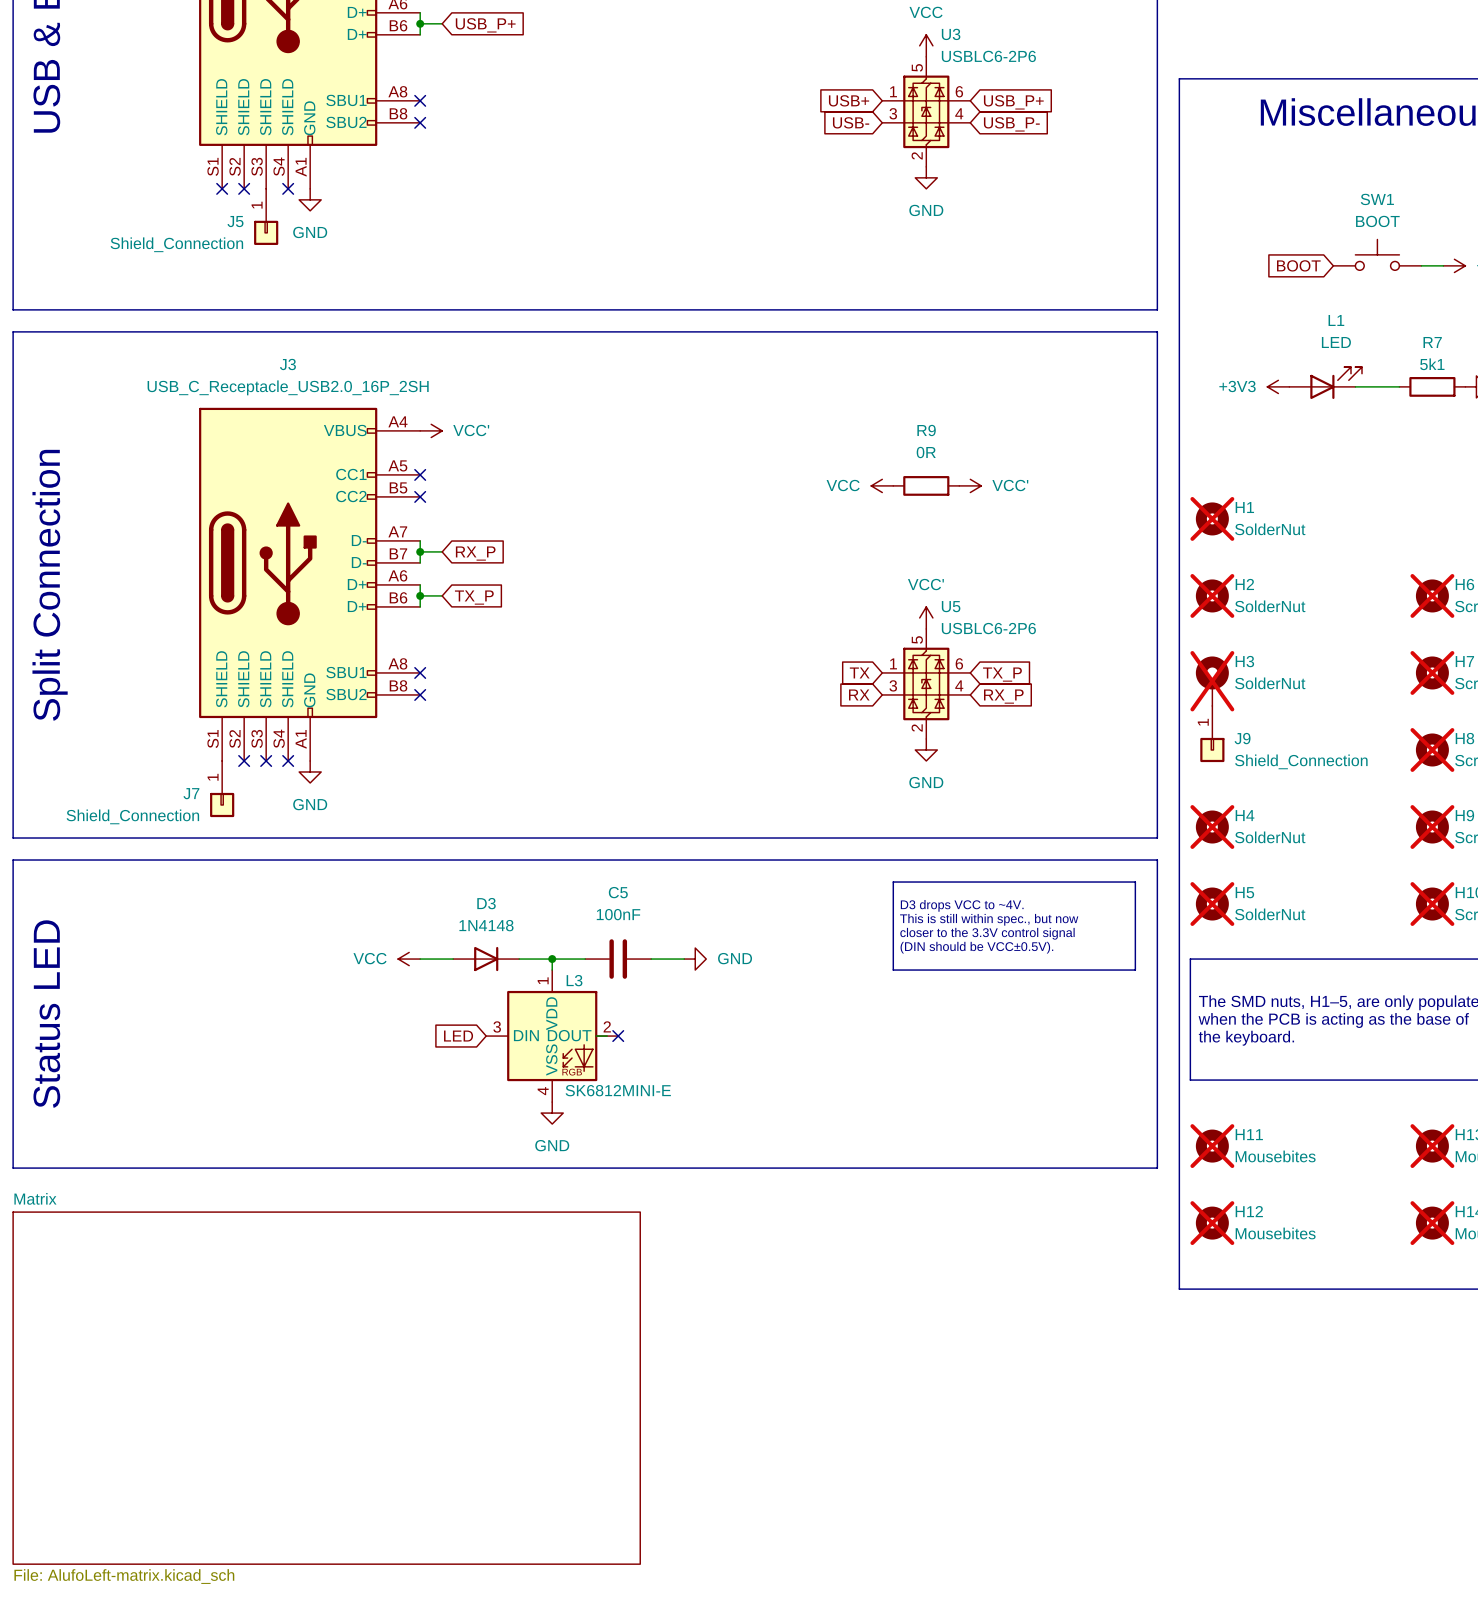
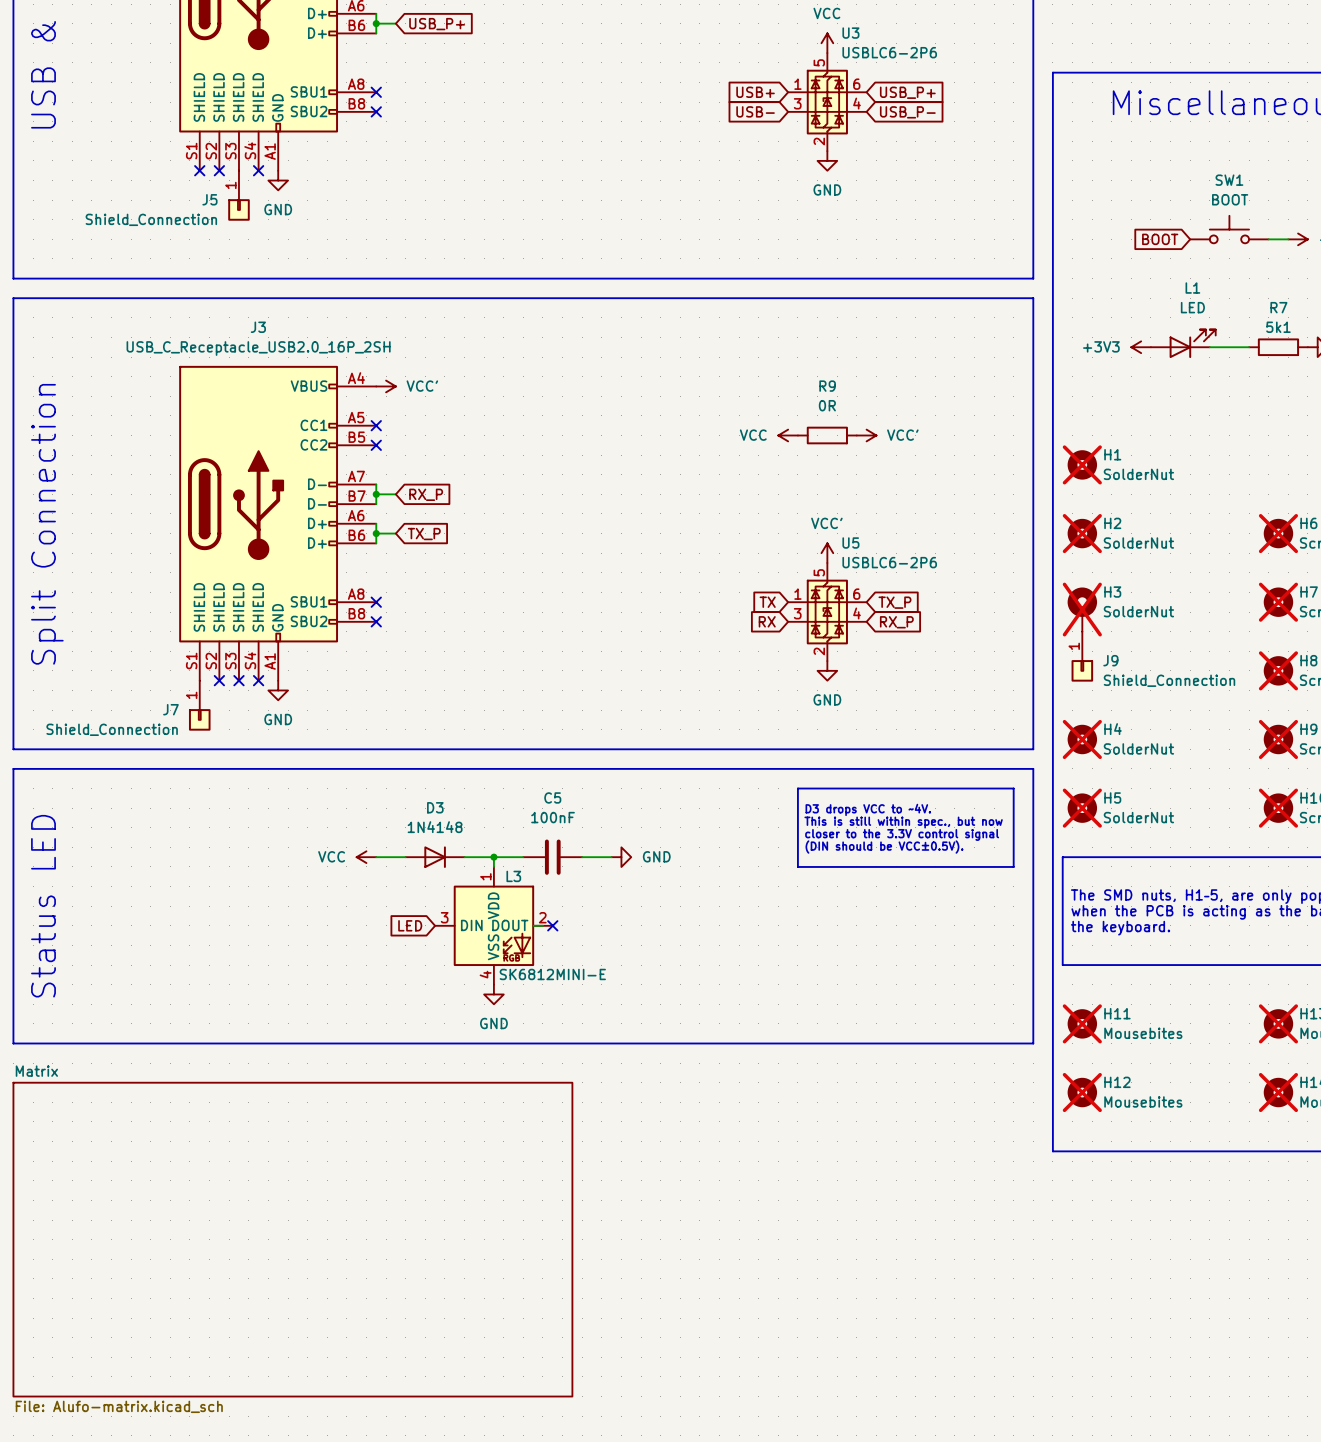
sheet Matrix value: File: AlufoLeft-matrix.kicad_sch (124, 1576) -> File: Alufo-matrix.kicad_sch (119, 1406)

